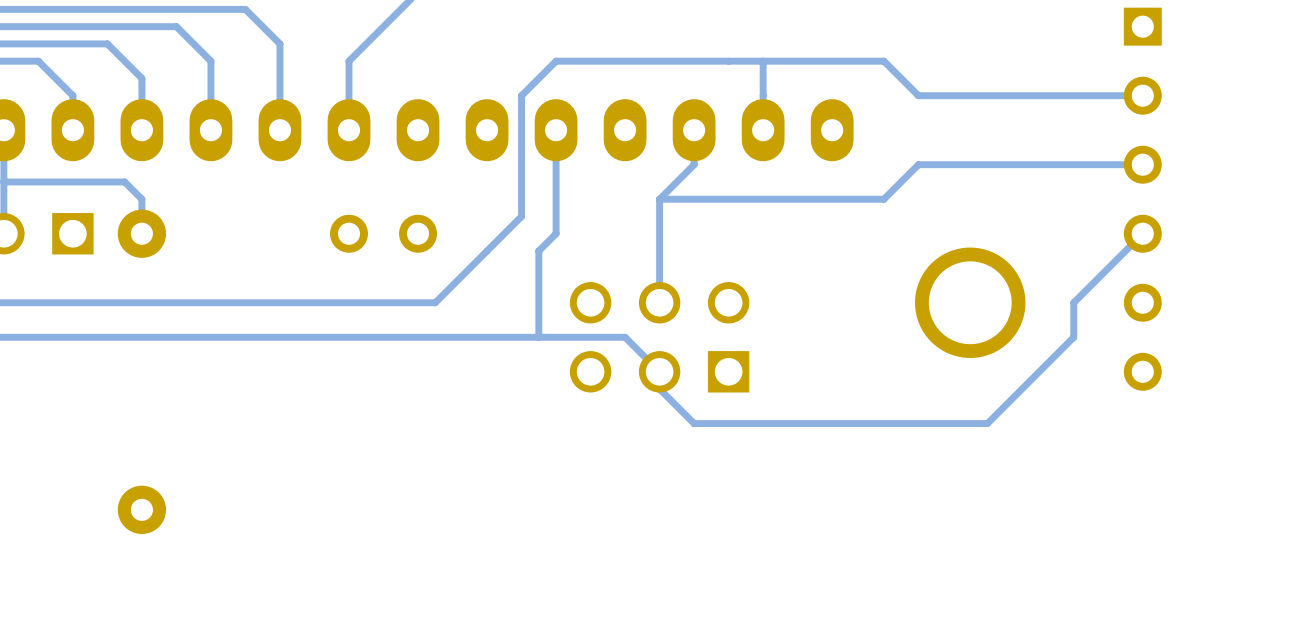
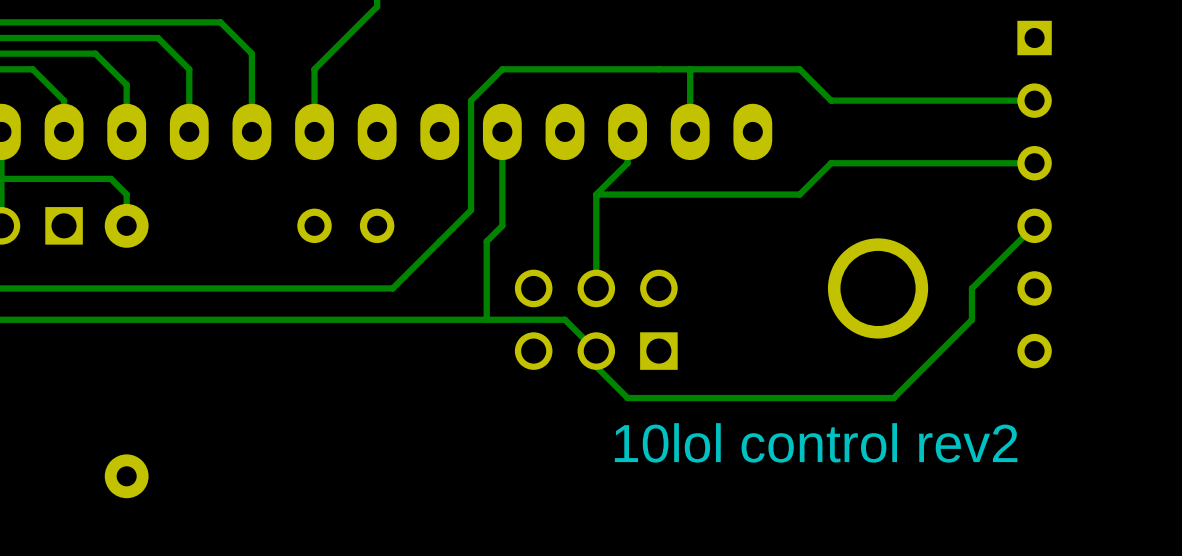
text: none -> 10lol control rev2 (816, 442)

